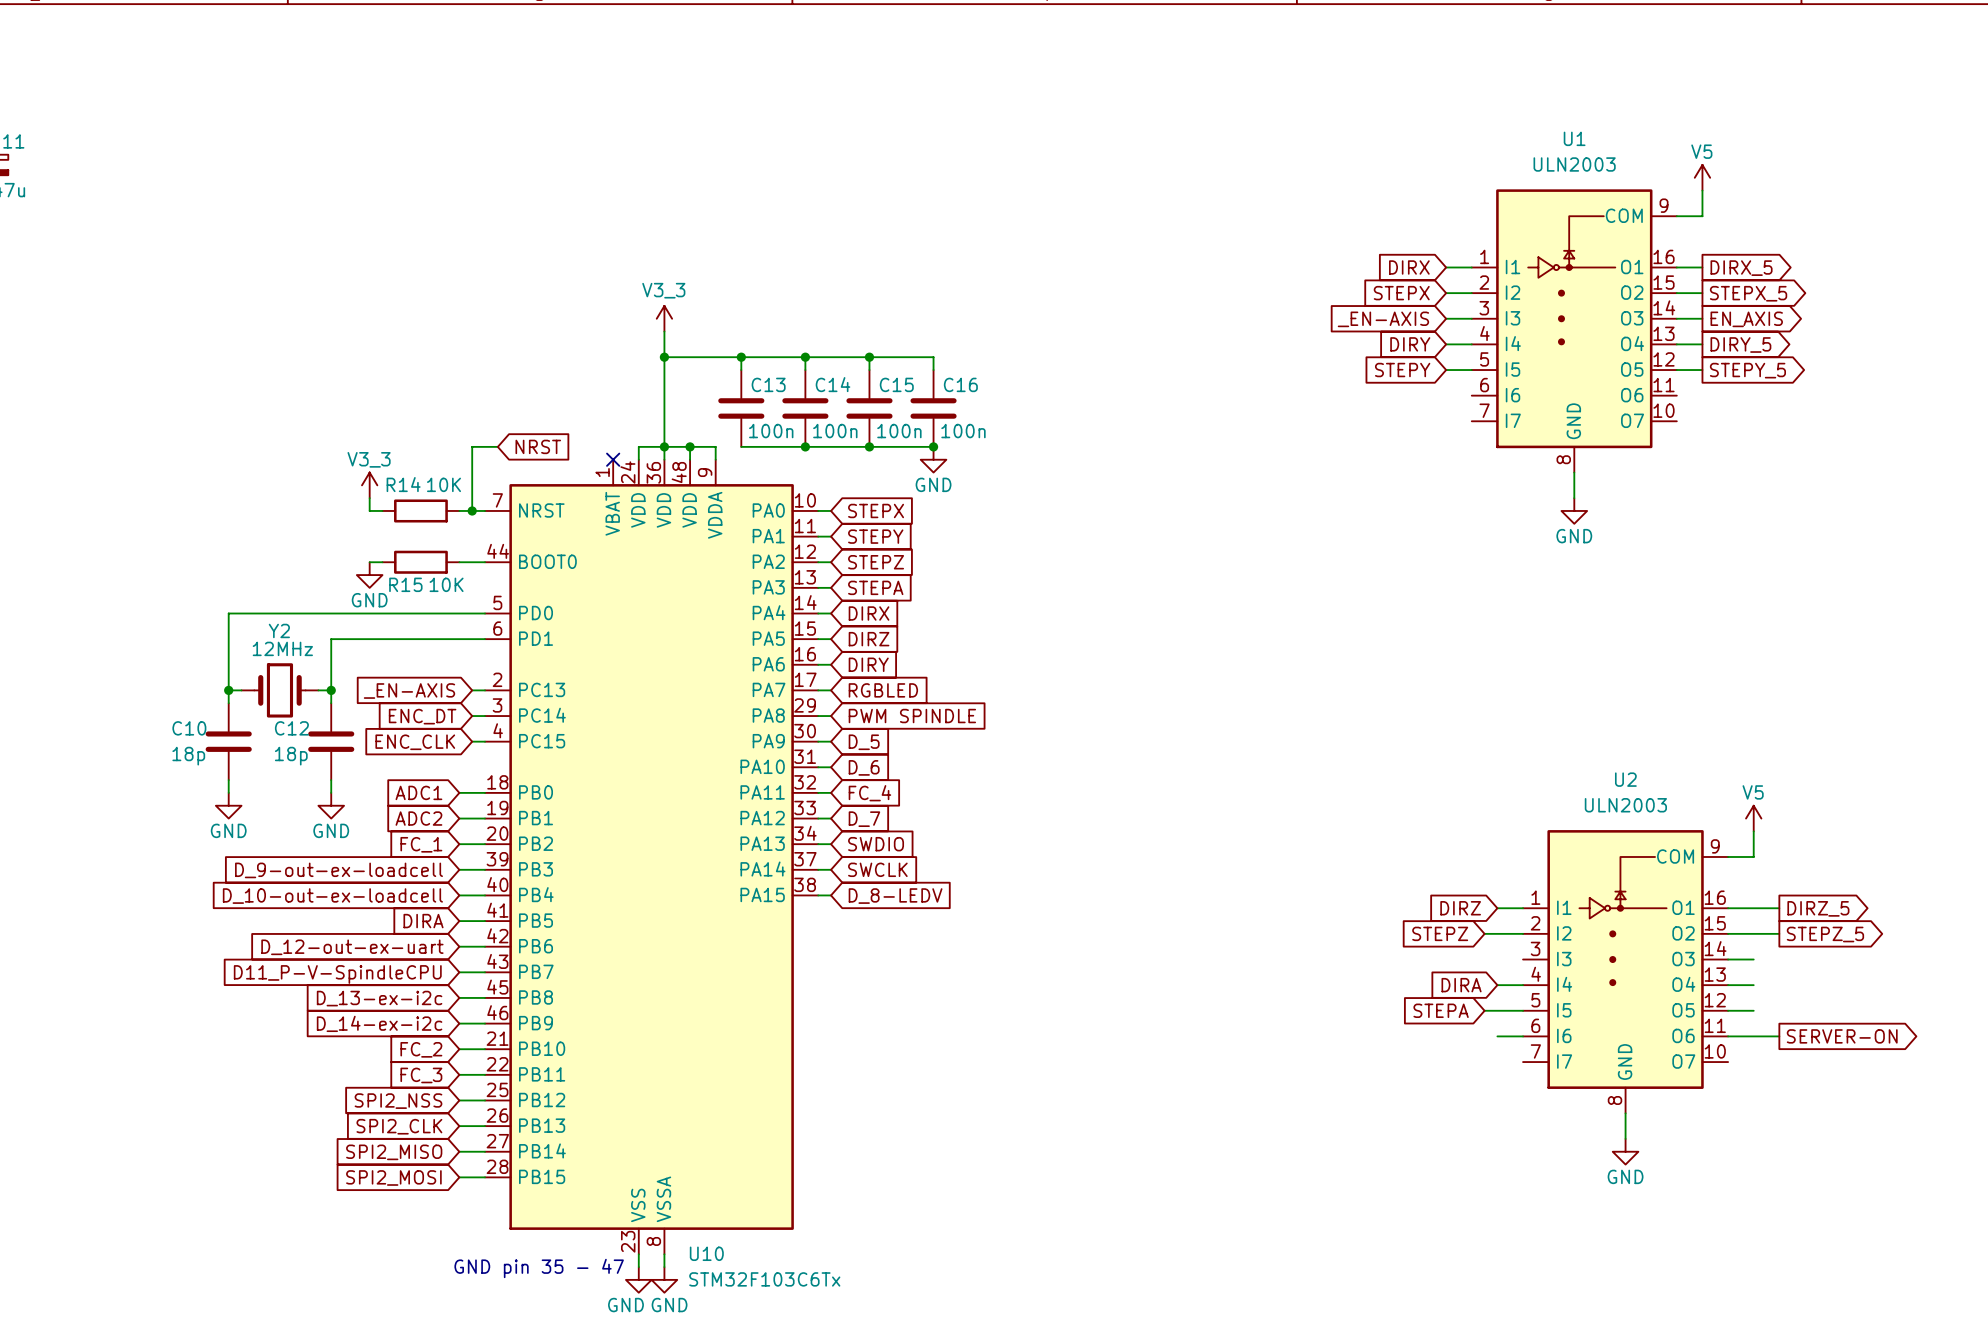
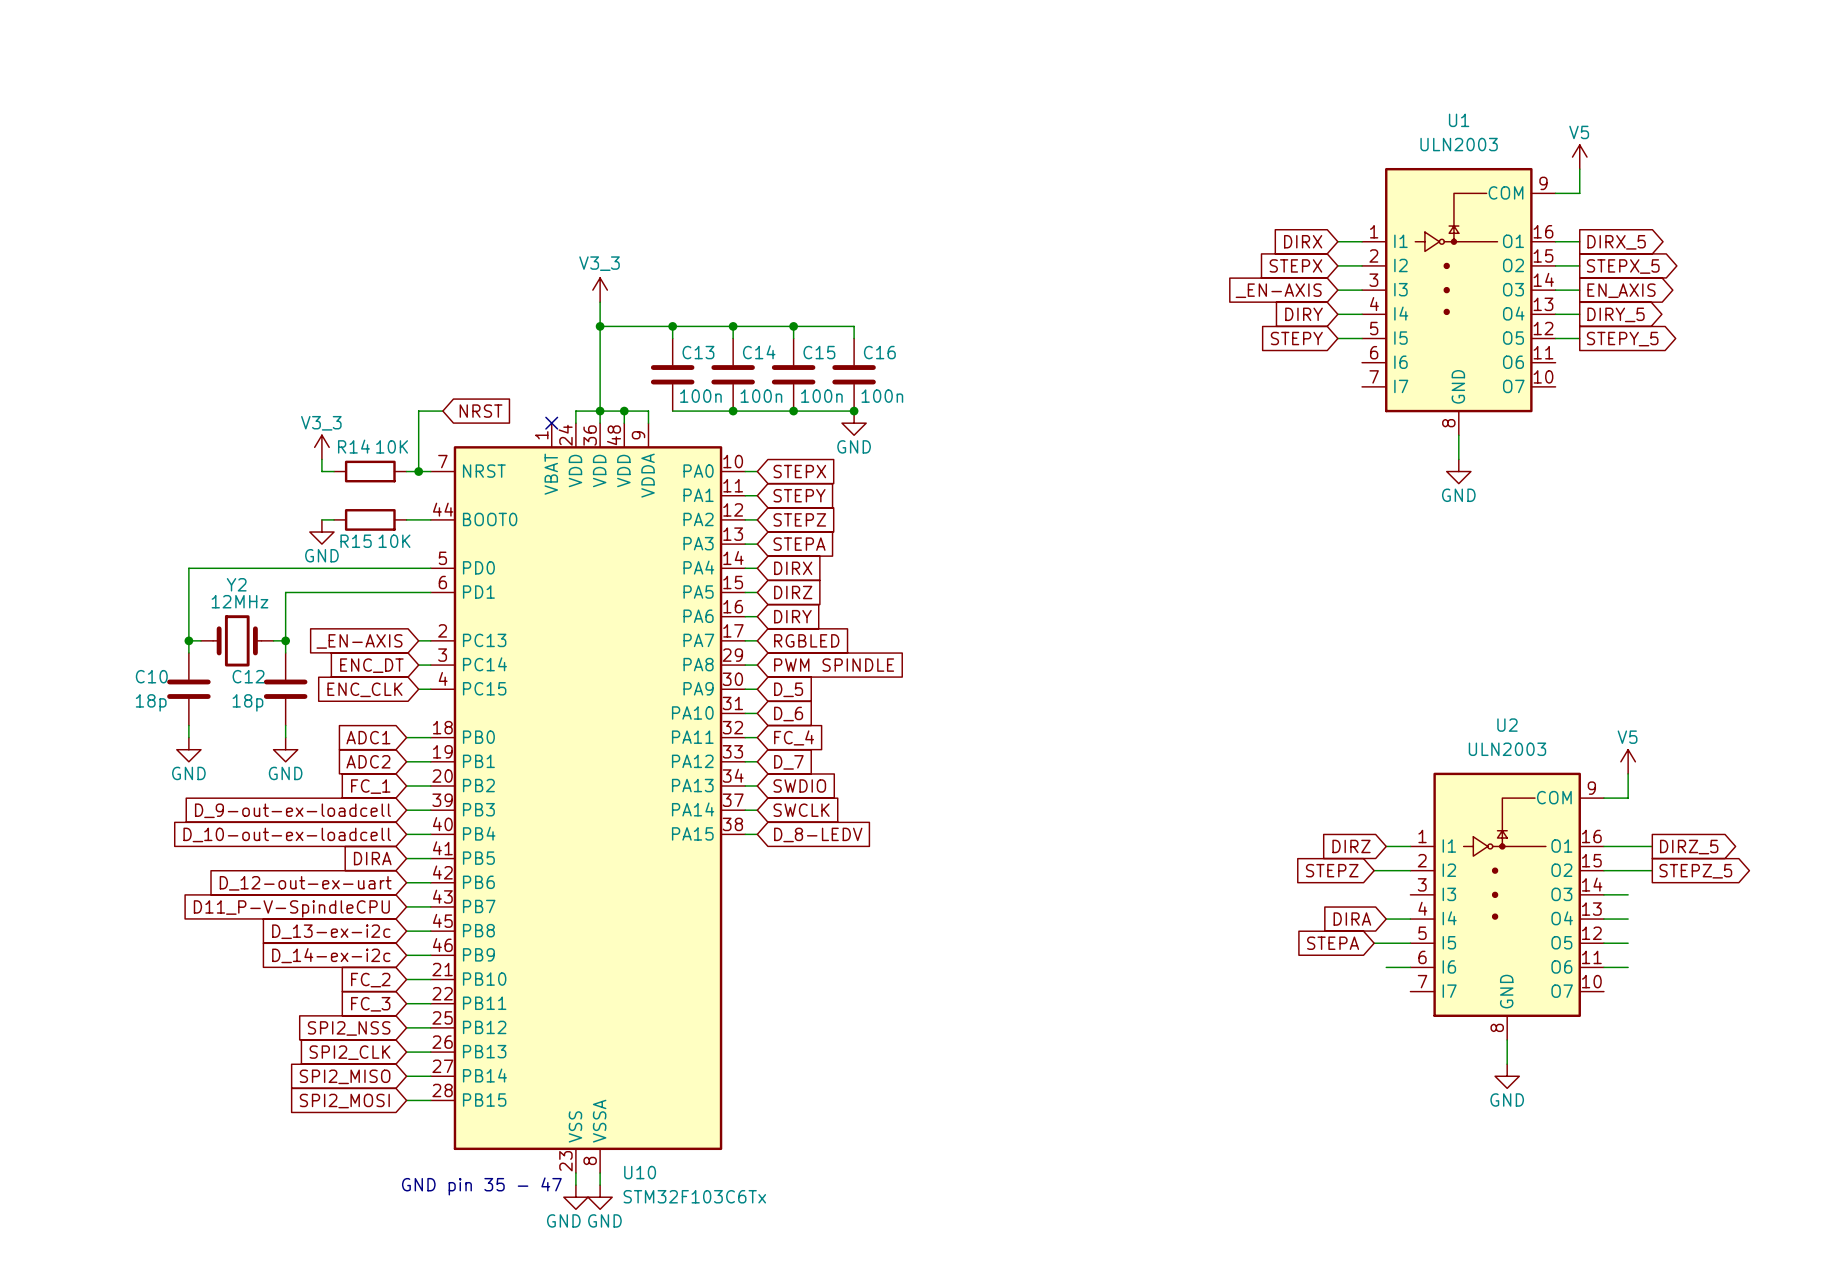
wire: (1753, 1036) (1779, 1036) -> none
global label: SERVER-ON (1842, 1036) -> none

